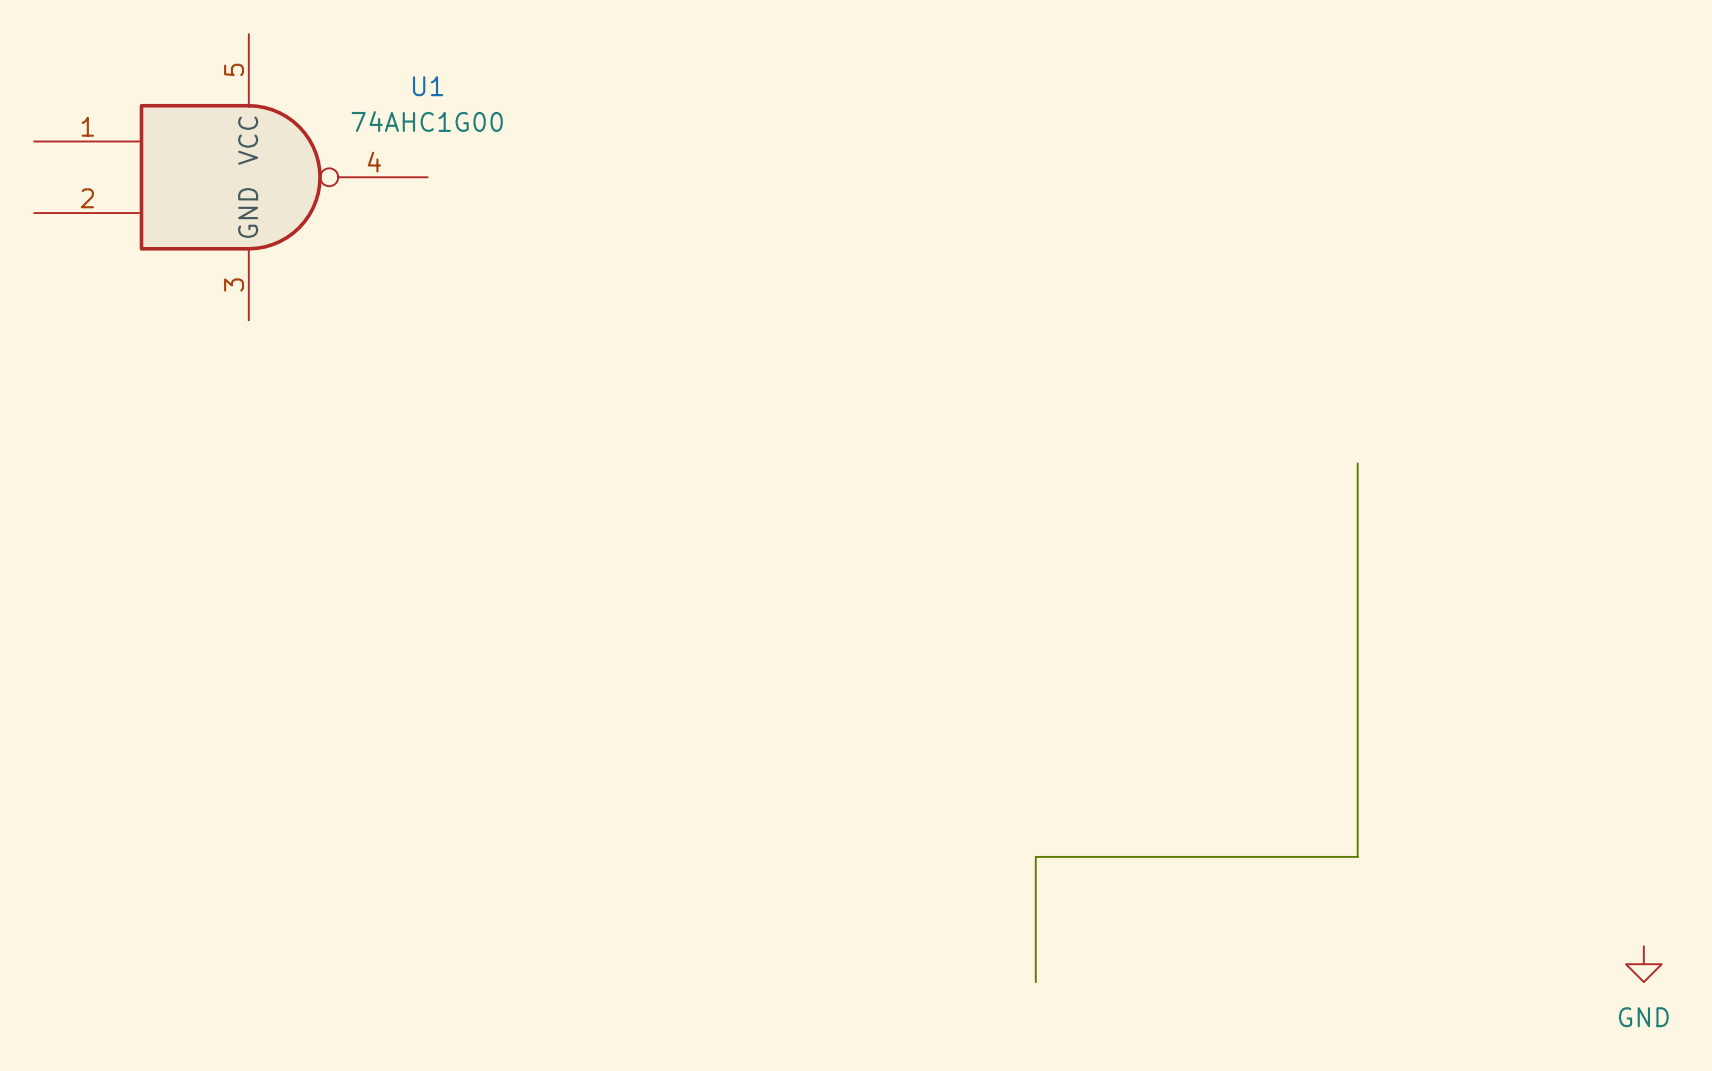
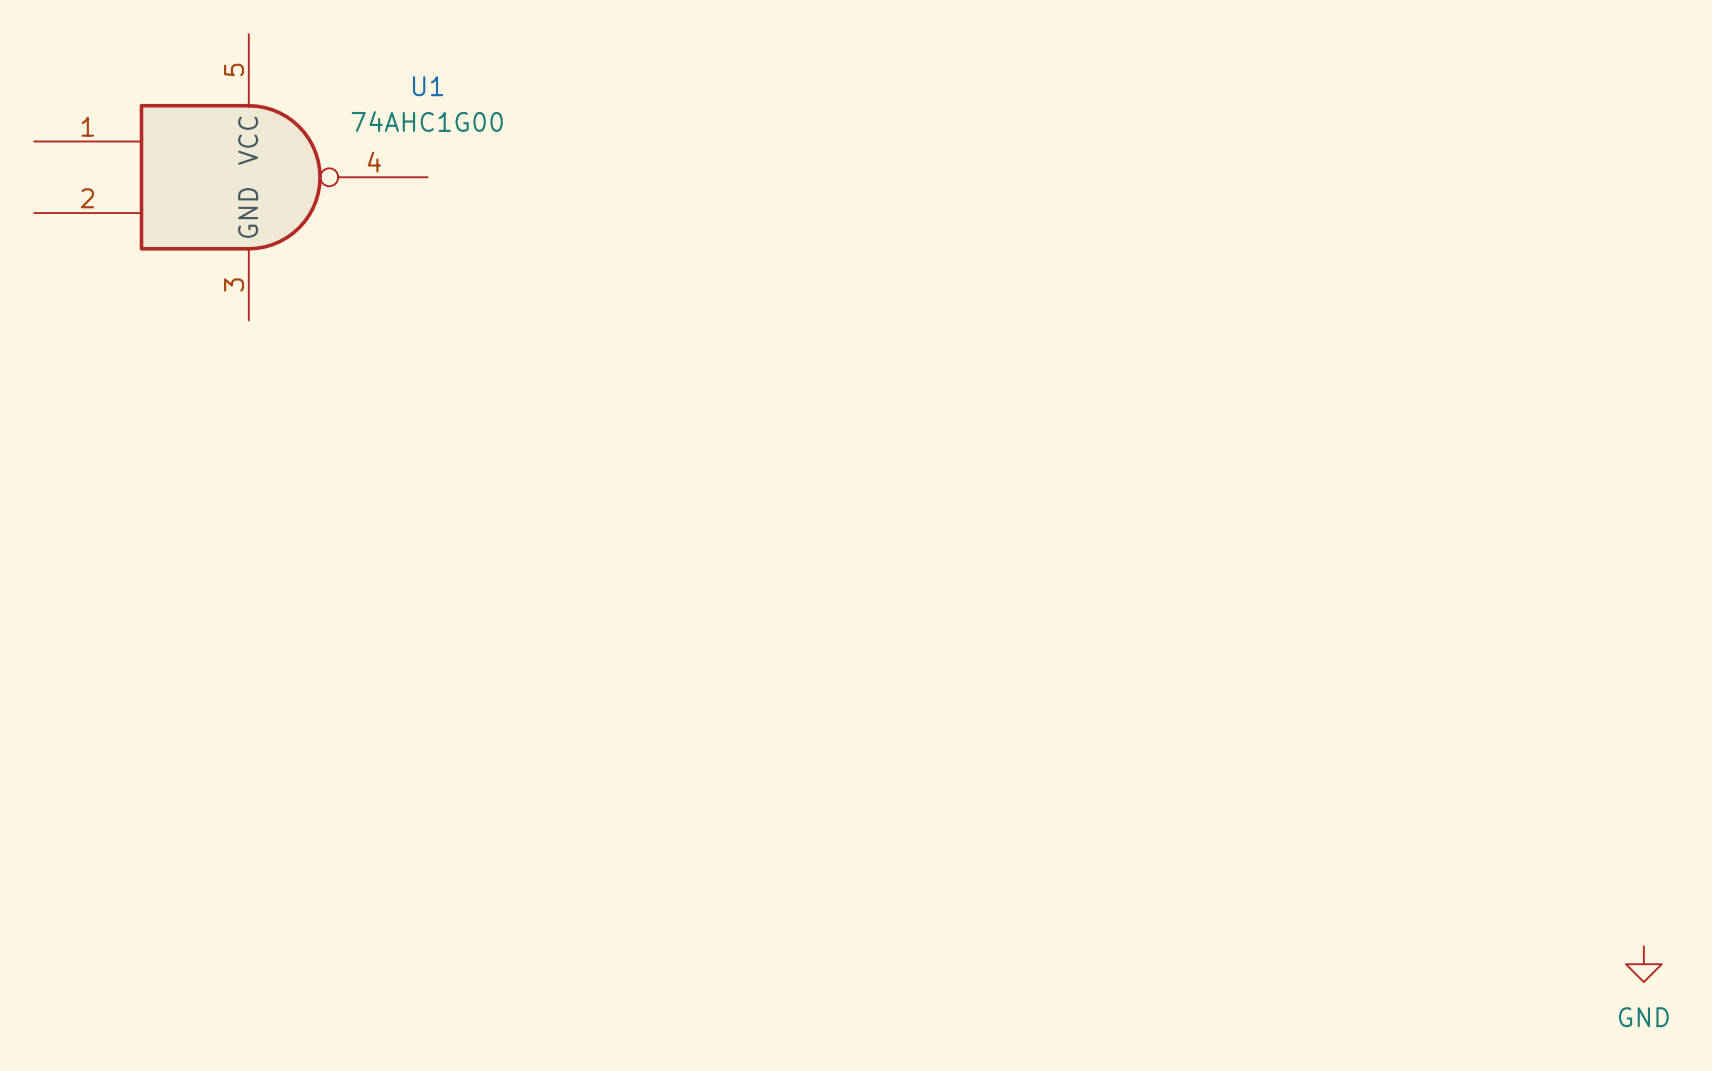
wire: (1357, 463) (1357, 856) (1035, 856) (1035, 982) -> none

